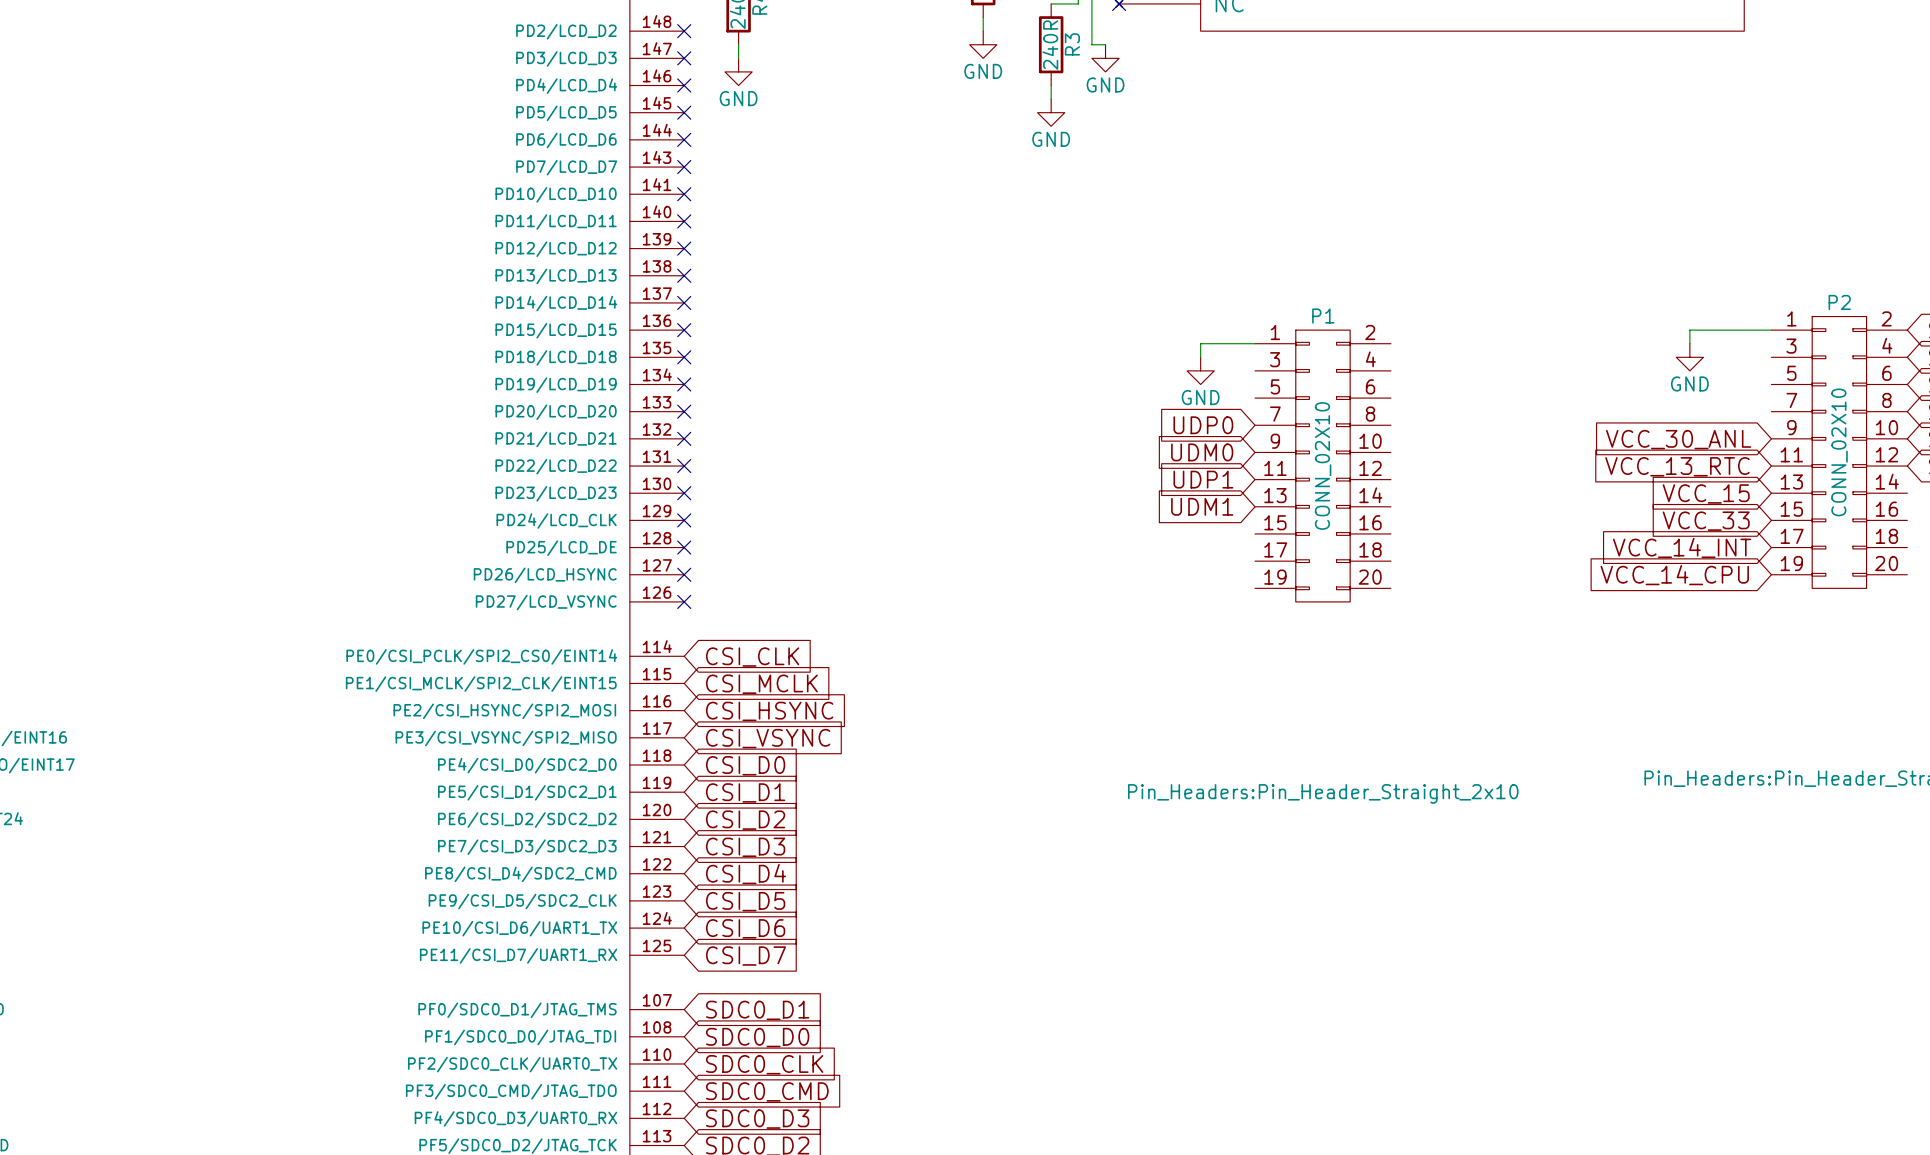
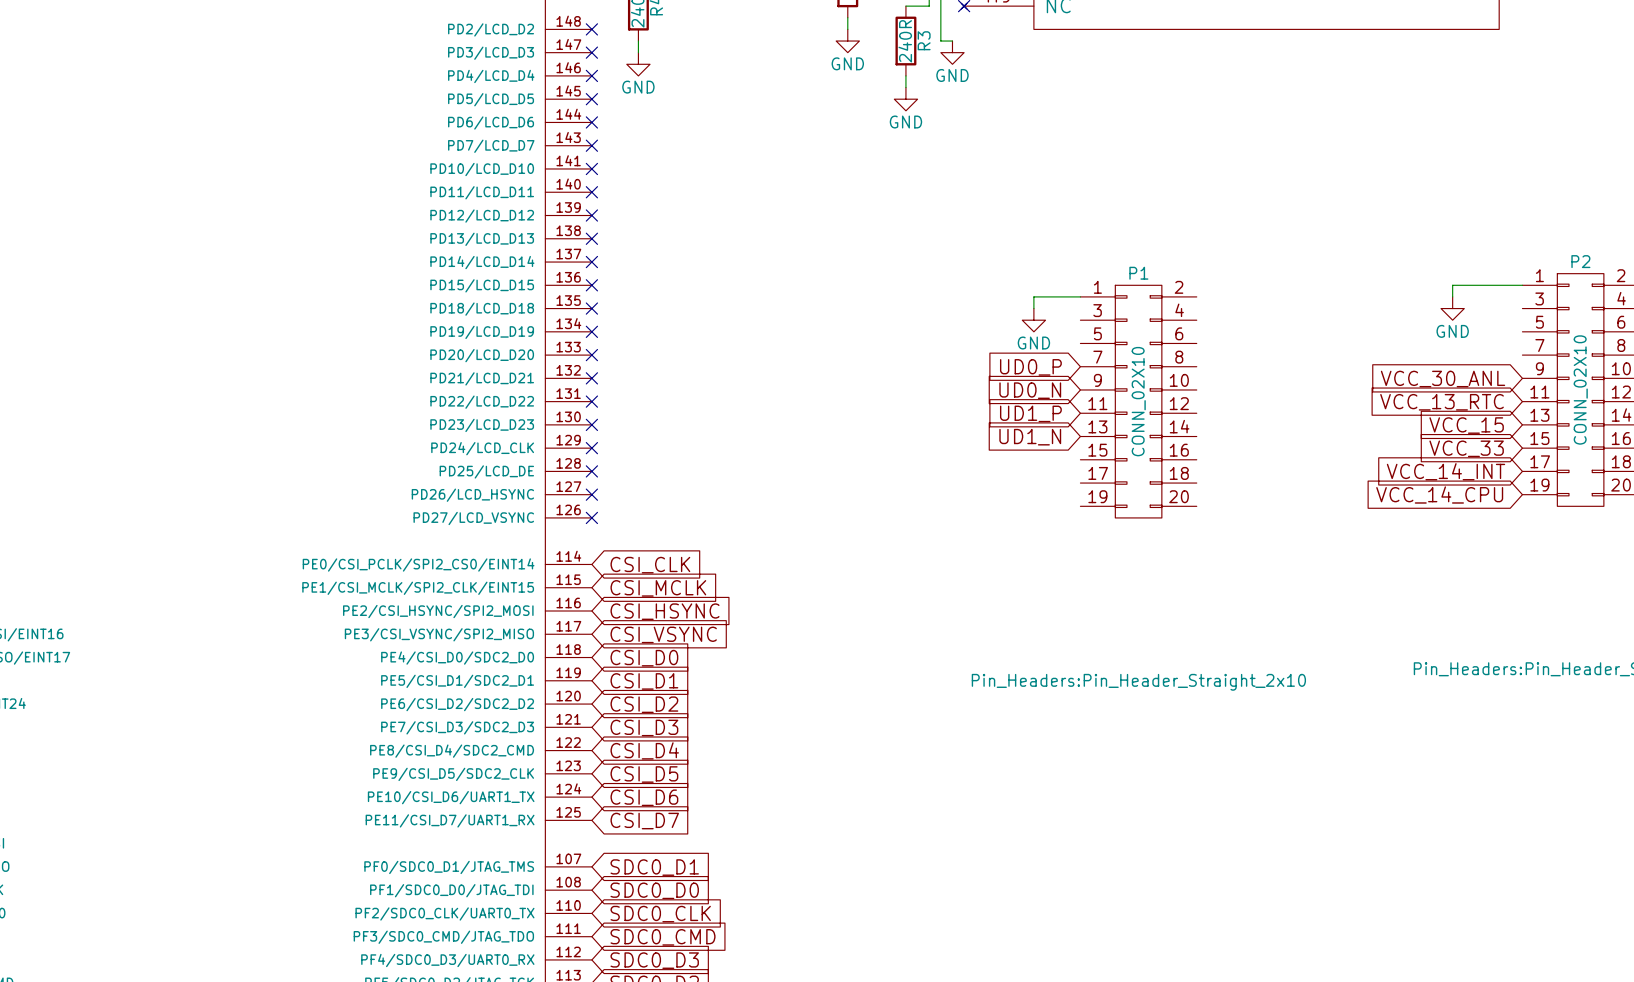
global label: UDP0 (1203, 425) -> UD0_P (1030, 367)
global label: UDM0 (1202, 452) -> UD0_N (1030, 390)
global label: UDP1 (1203, 479) -> UD1_P (1030, 413)
global label: UDM1 (1202, 506) -> UD1_N (1030, 437)

